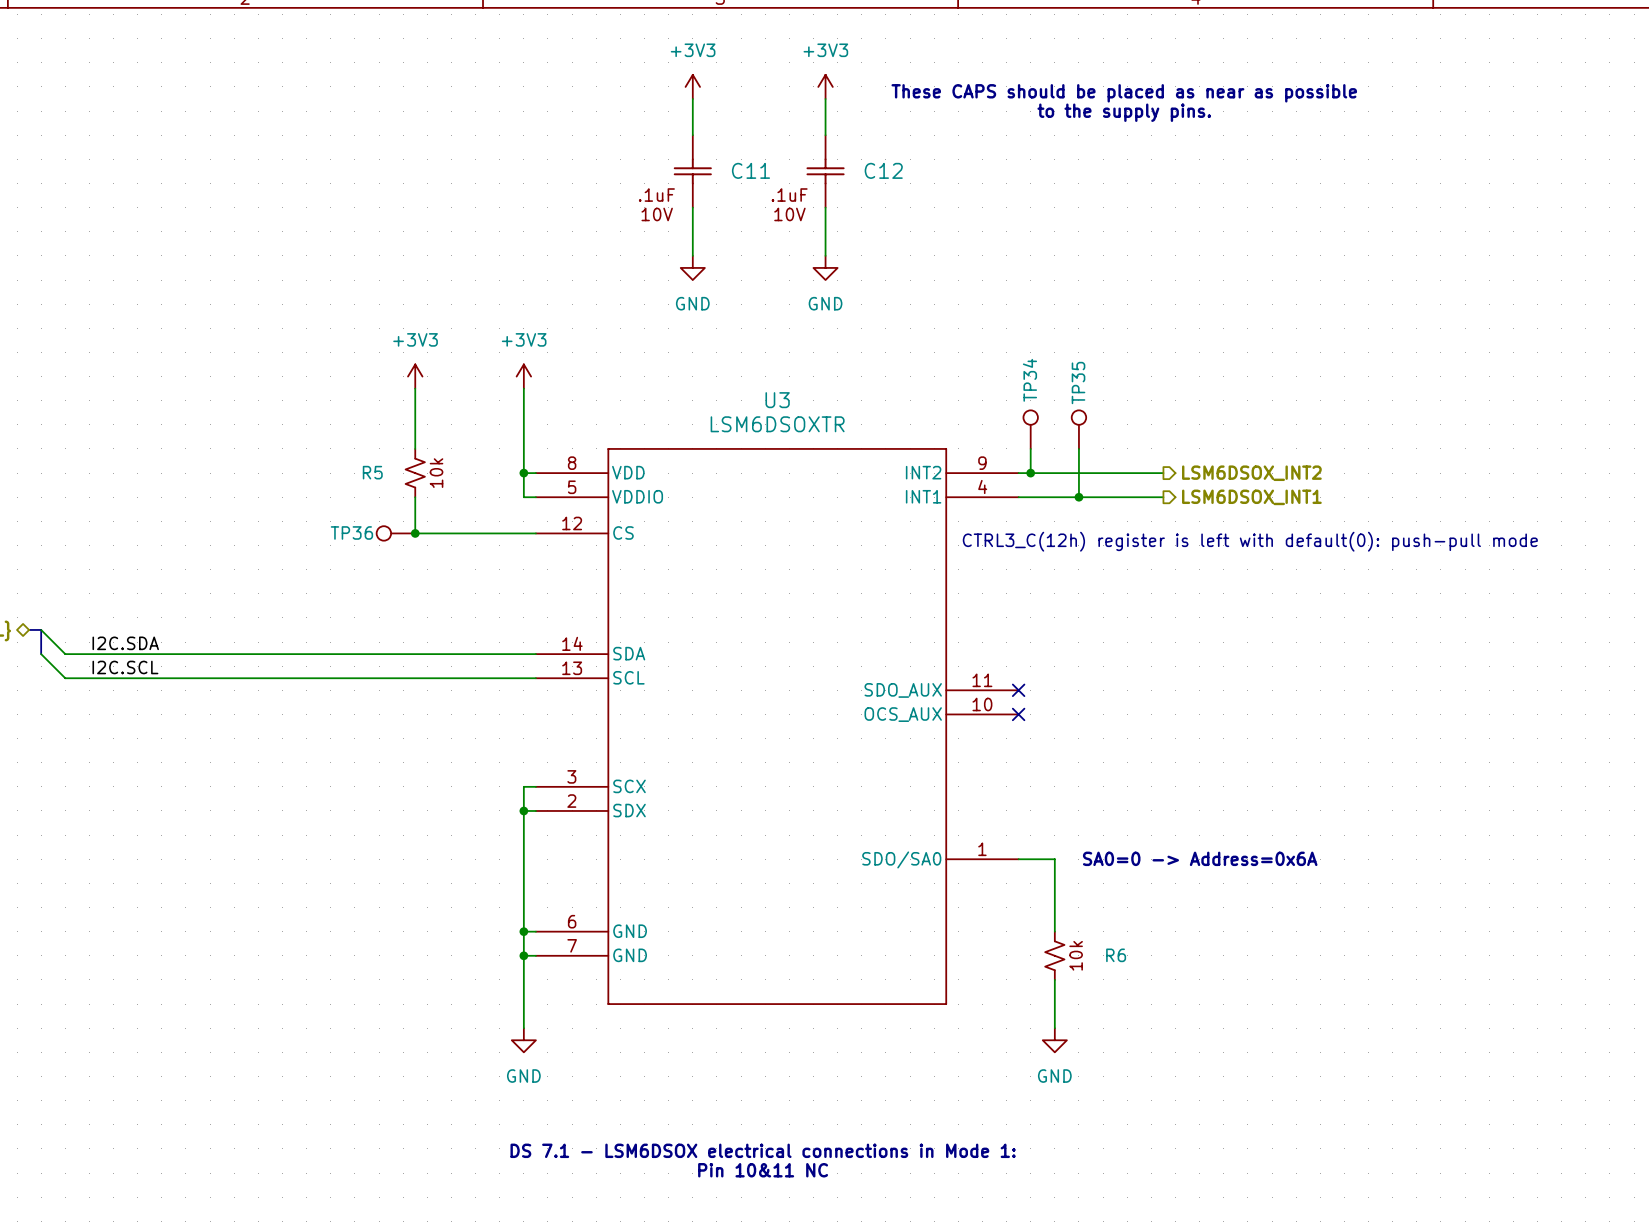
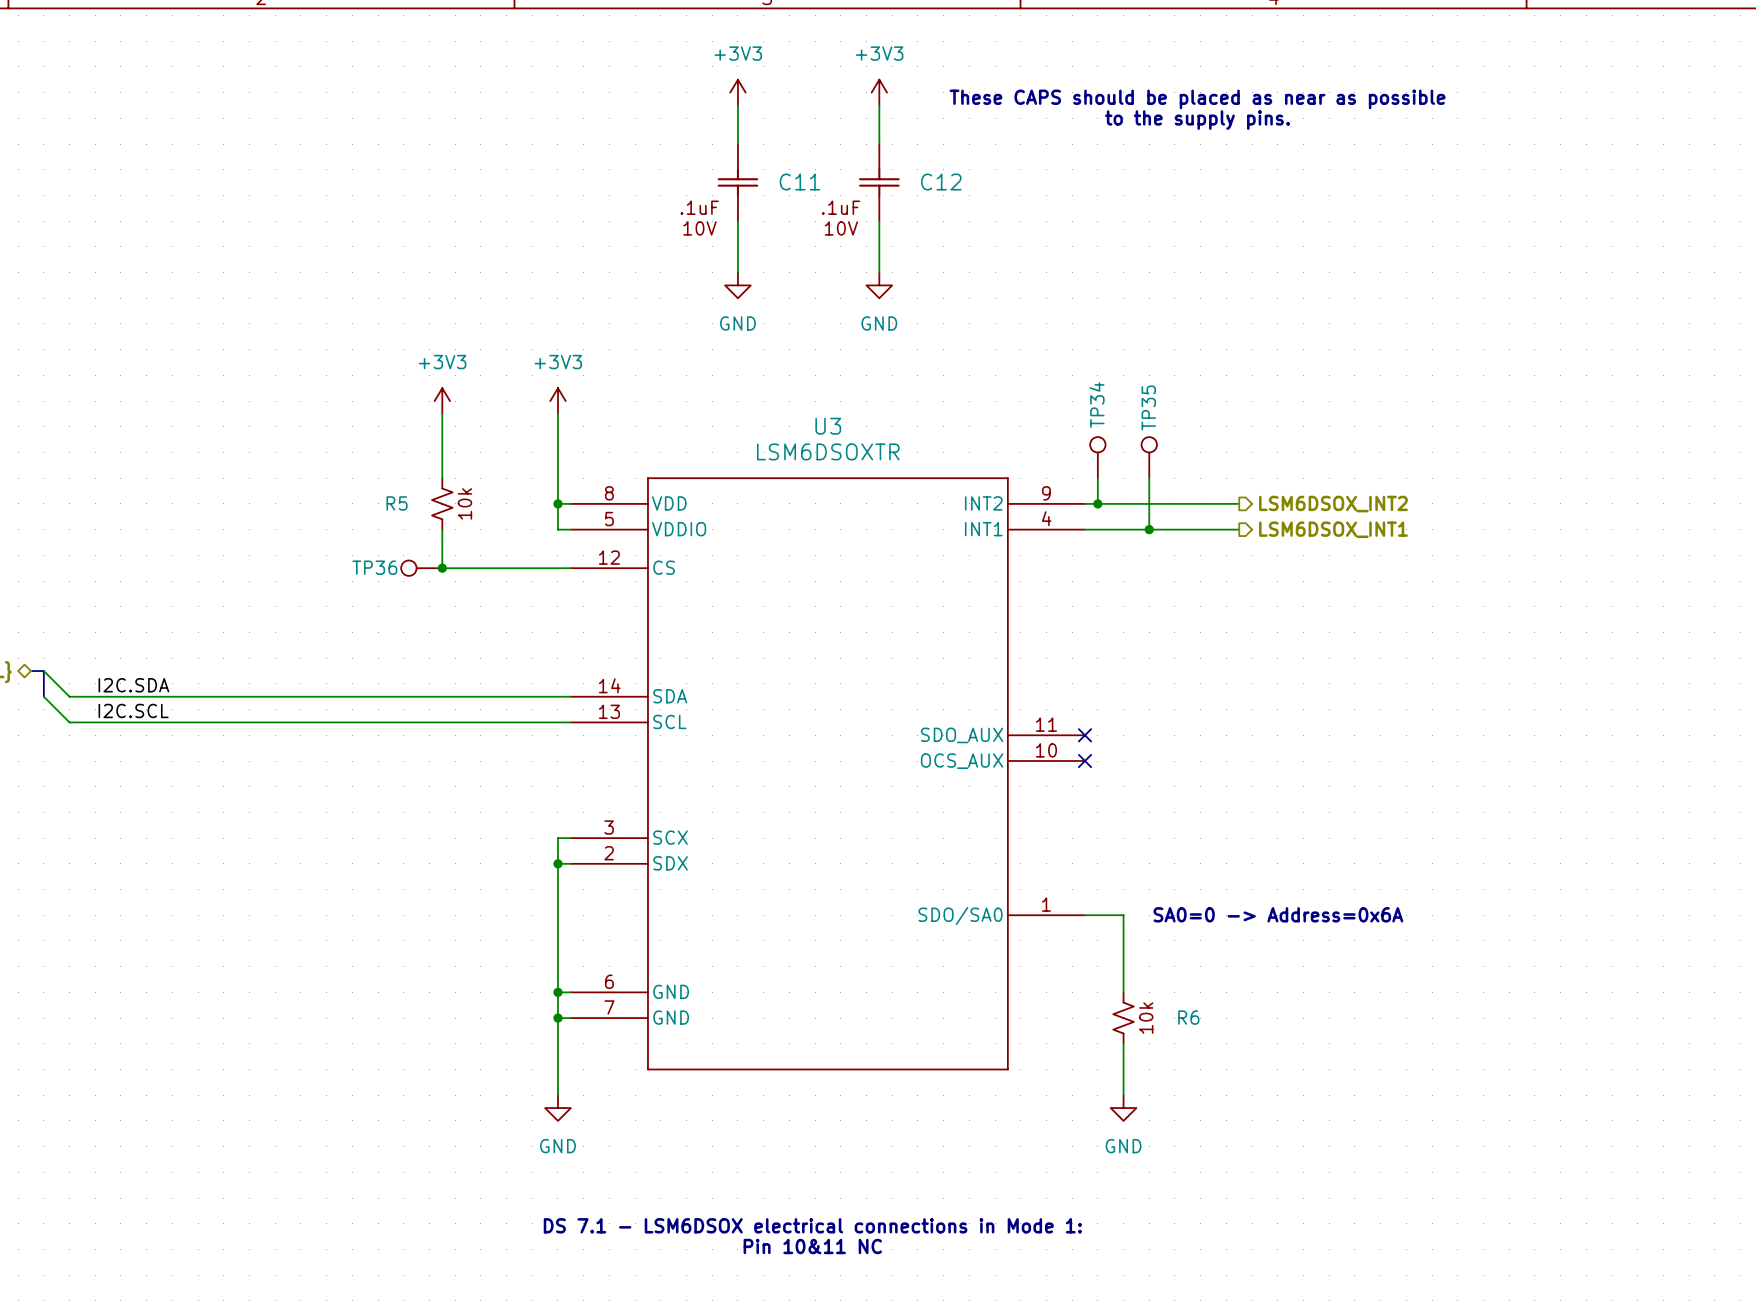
text: CTRL3_C(12h) register is left with default(0): push-pull mode (1250, 541) -> none

